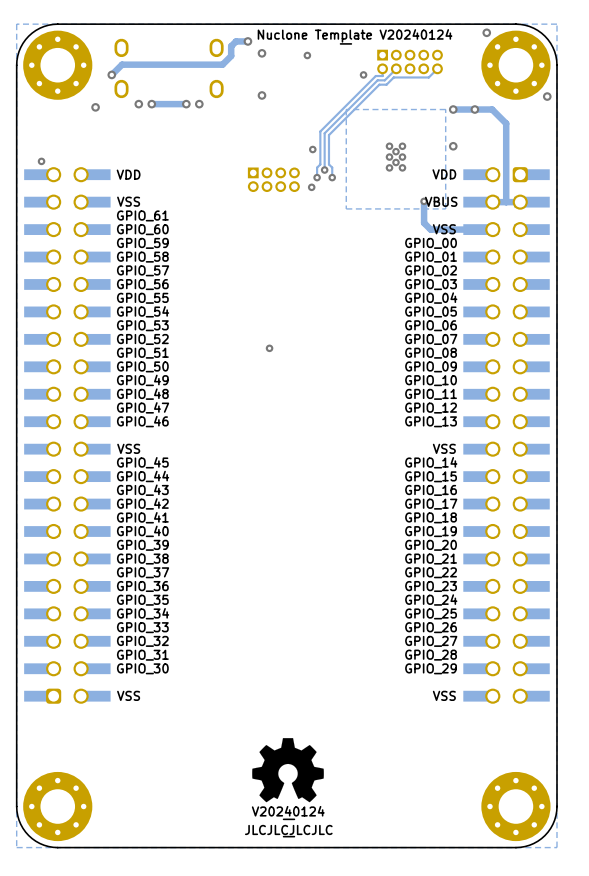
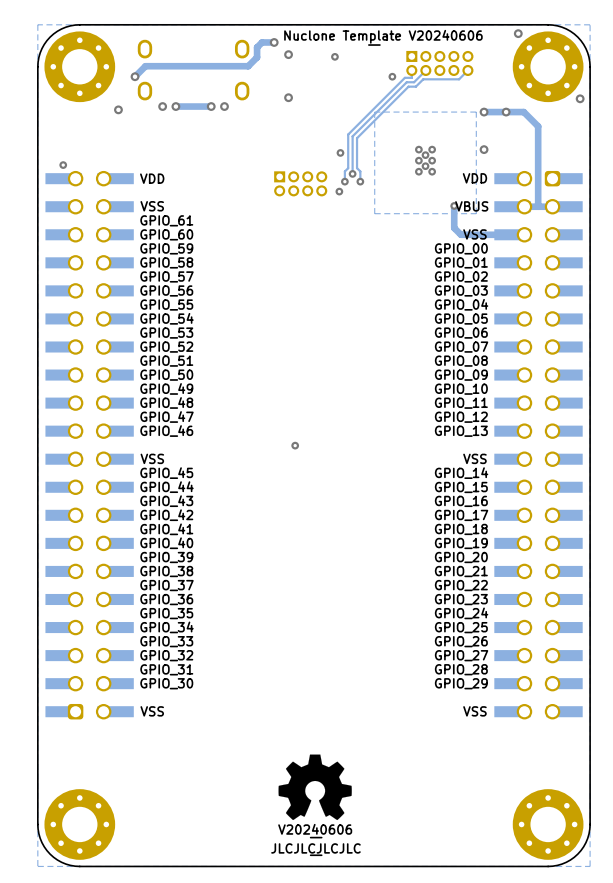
drawing shape: [257, 29, 453, 45] -> [284, 29, 483, 46]
via: (269, 348) -> none
via: none -> (295, 445)
drawing shape: [251, 805, 325, 821] -> [278, 823, 353, 839]

